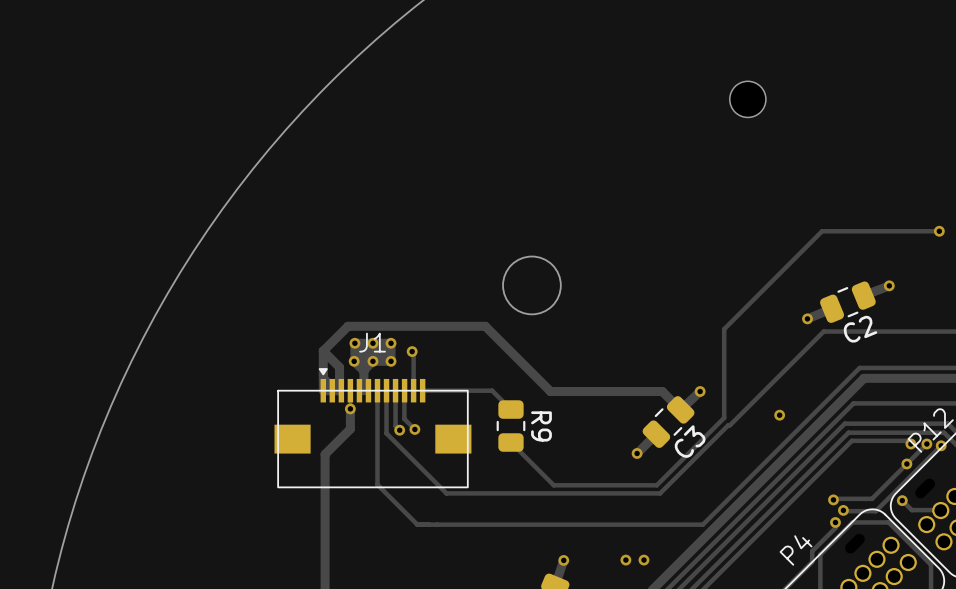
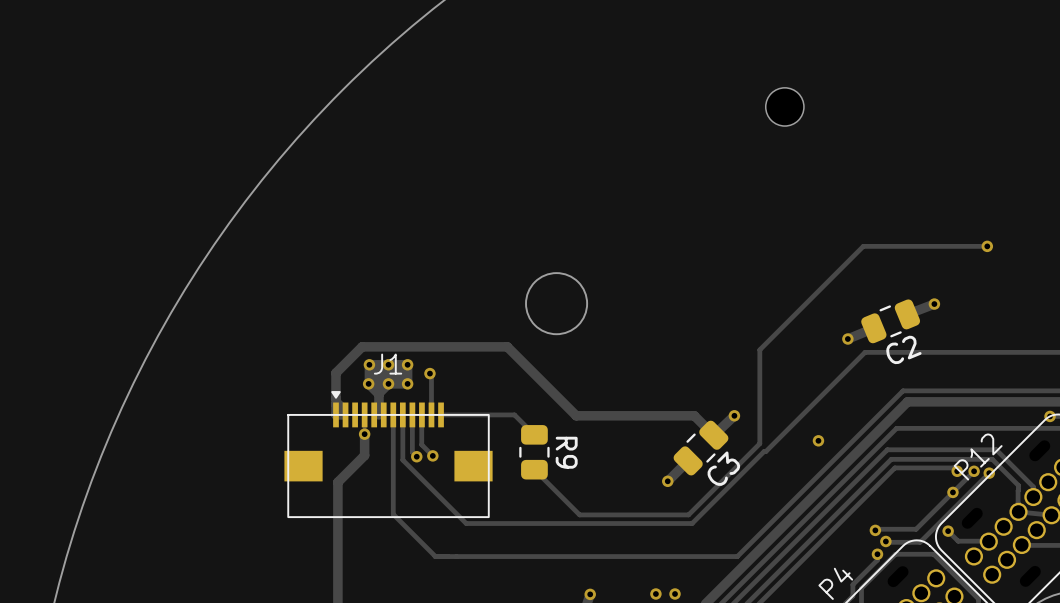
track: (323, 351) (339, 367) (339, 390) (330, 390) -> none

